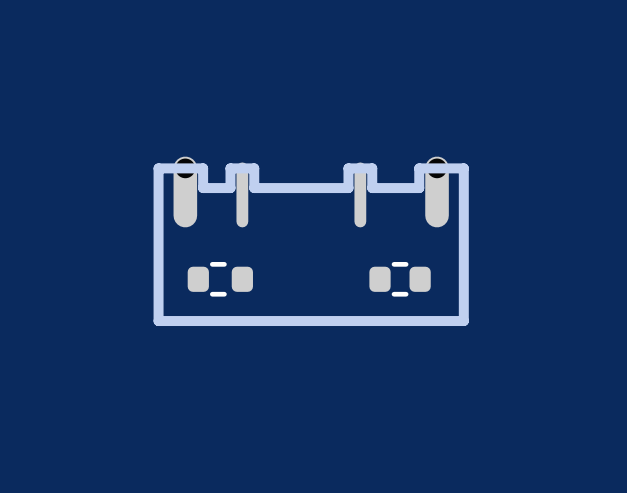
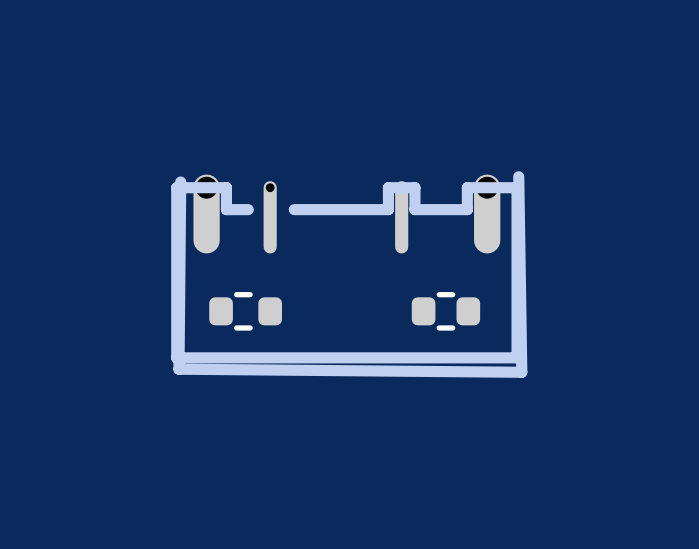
board edge: none -> (518, 176) (521, 372) (178, 369) (180, 182)
board edge: (222, 188) (230, 188) (230, 168) (254, 168) (254, 188) (263, 188) -> none

